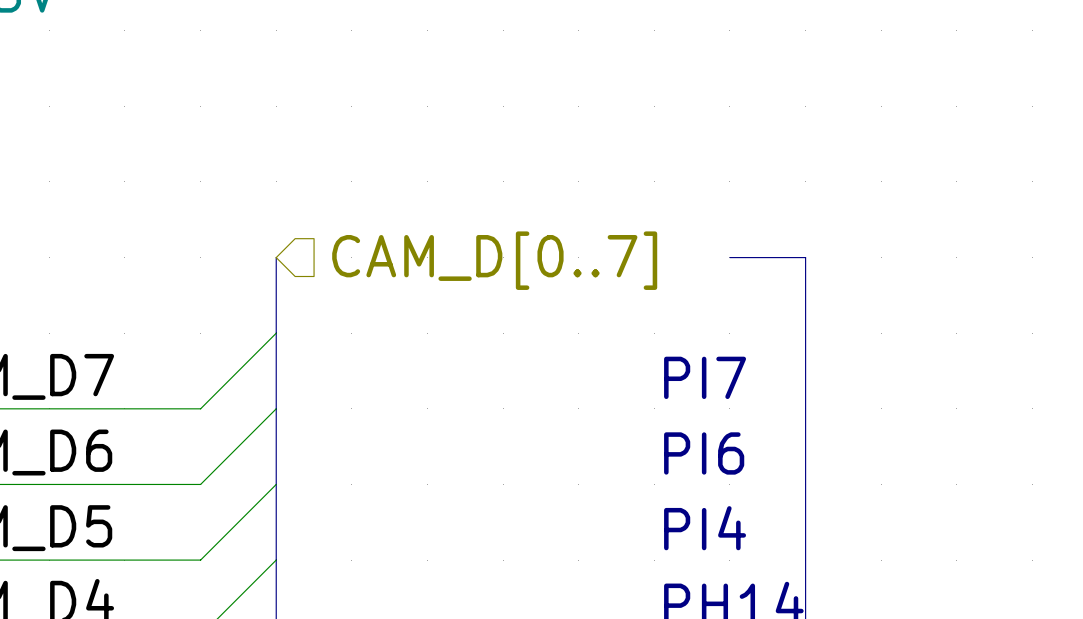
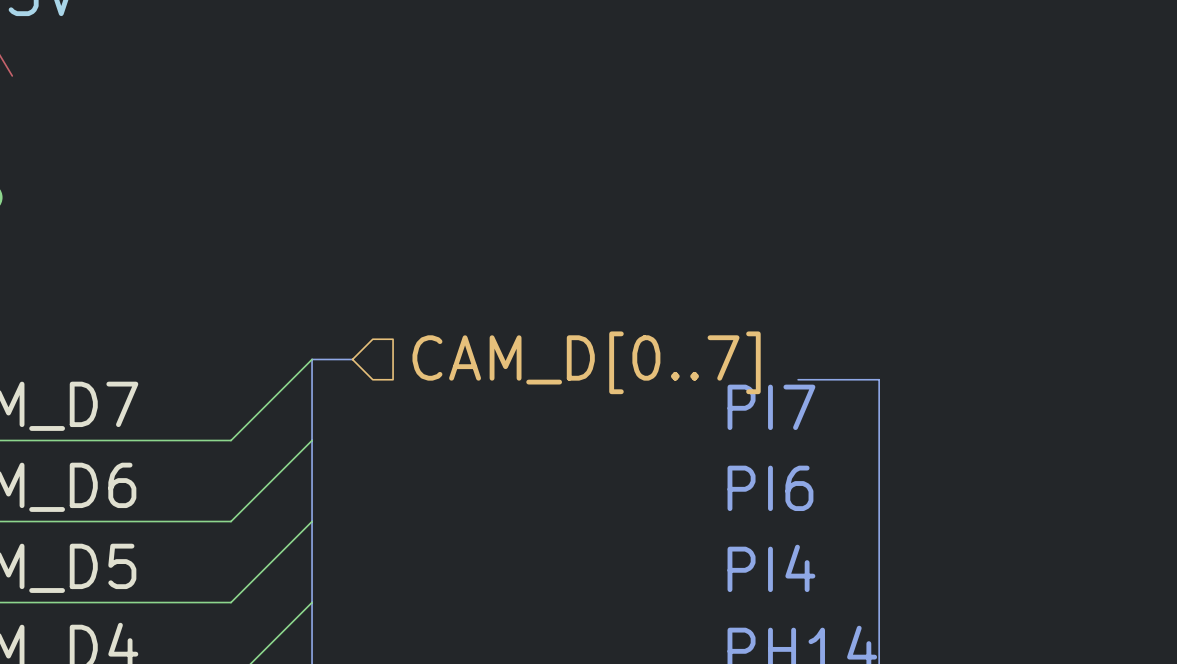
bus: (276, 257) (276, 333) -> (352, 359) (312, 359)
line: (729, 257) (805, 257) (805, 352) -> (798, 379) (879, 379)
hierarchical label position: CAM_D[0..7] (494, 260) -> CAM_D[0..7] (586, 362)

